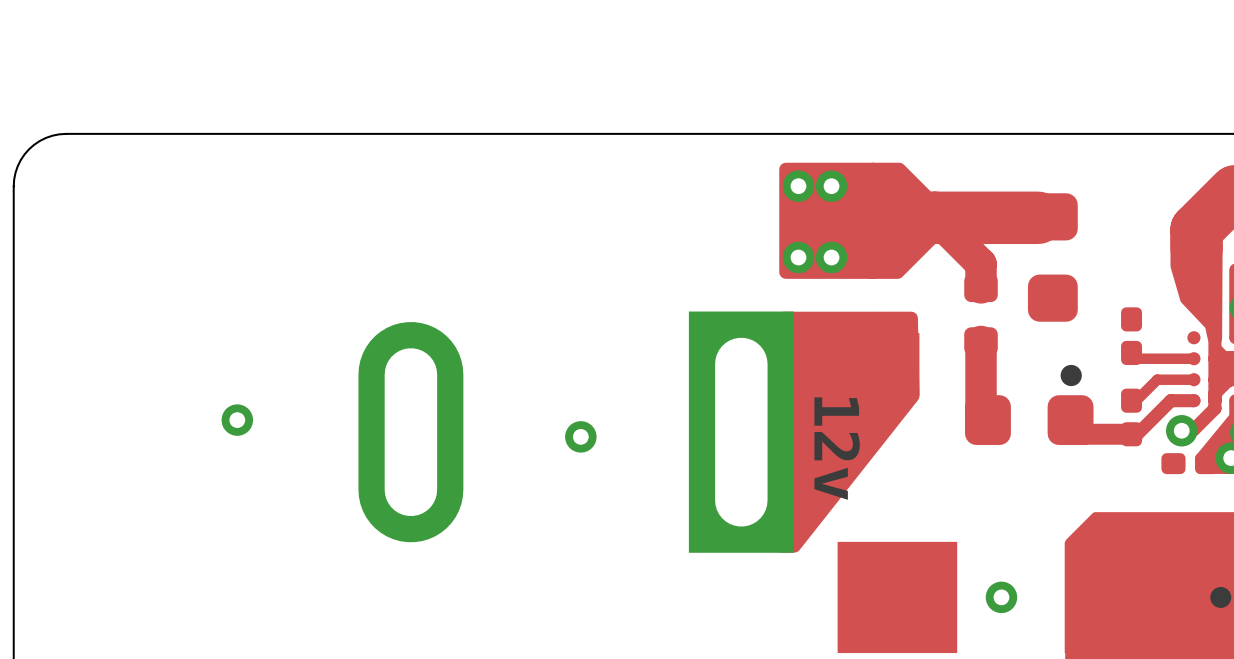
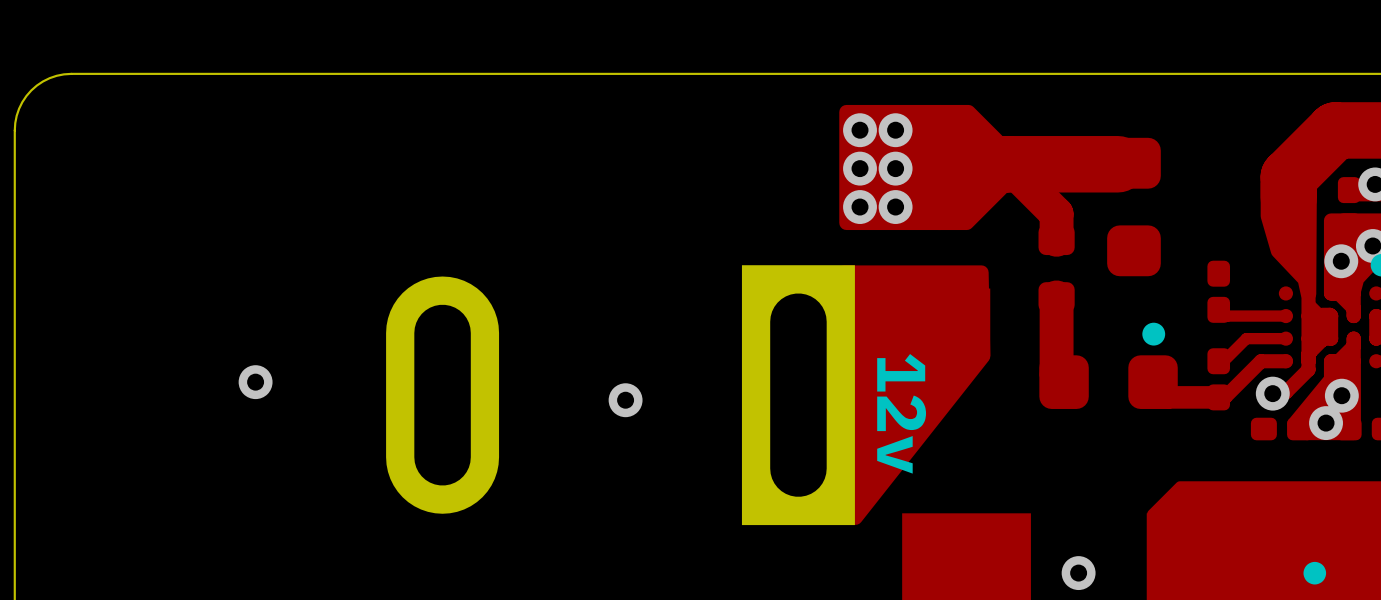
via: none -> (860, 168)
via: none -> (895, 168)

